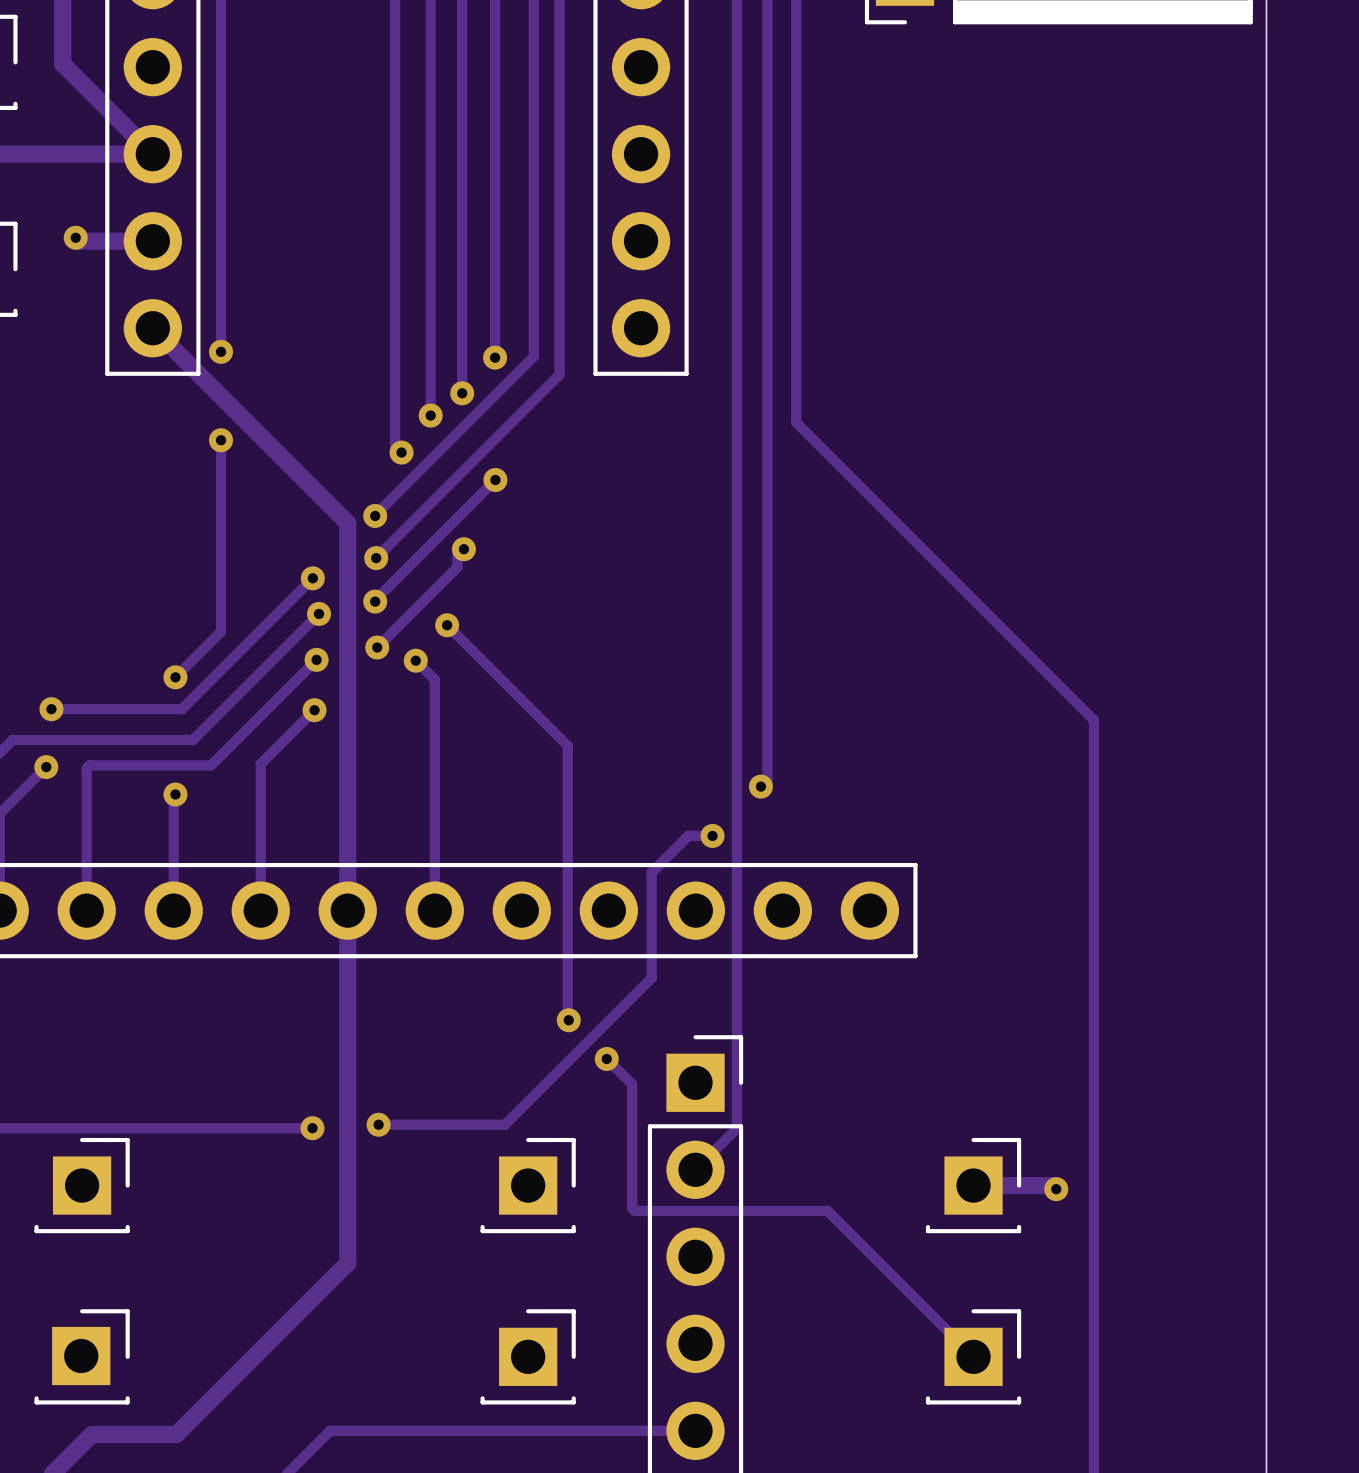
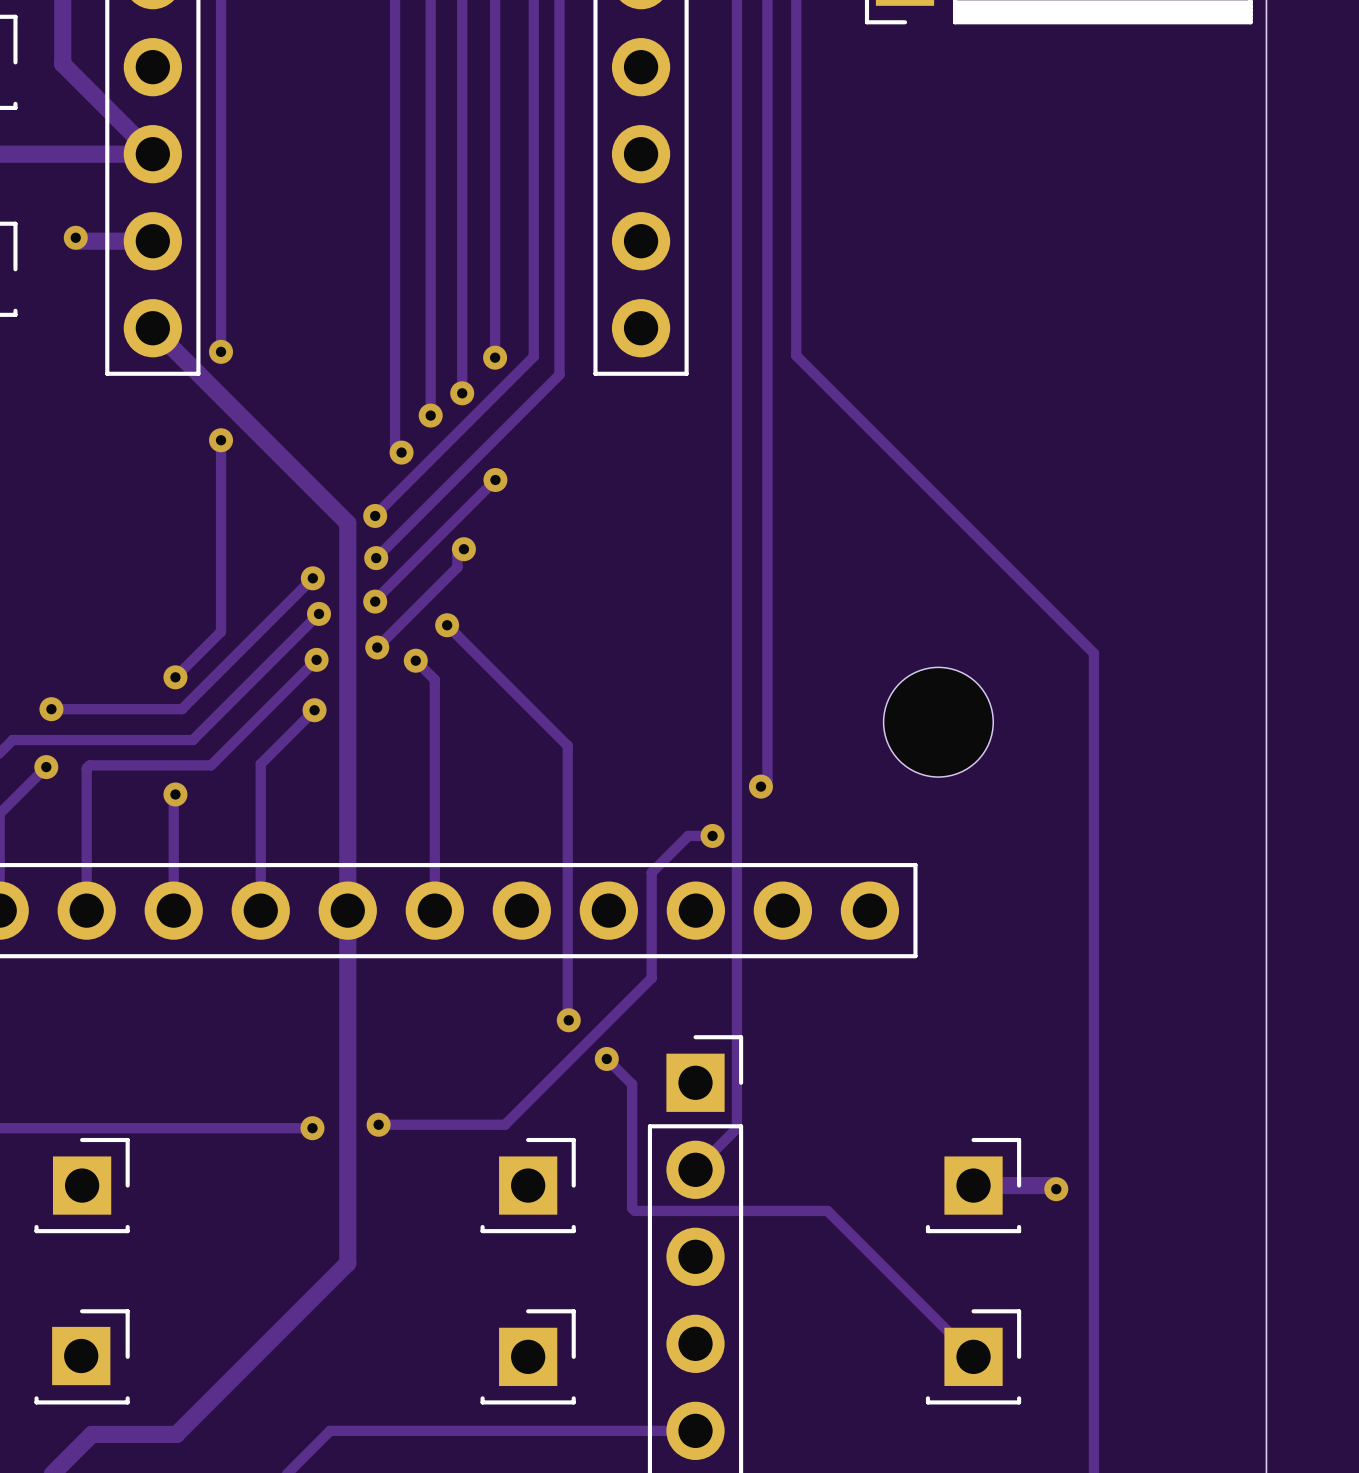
track: (796, 355) (796, 422) (1093, 720) -> (796, 355) (1093, 653) (1093, 720)
part: none -> (938, 722)

